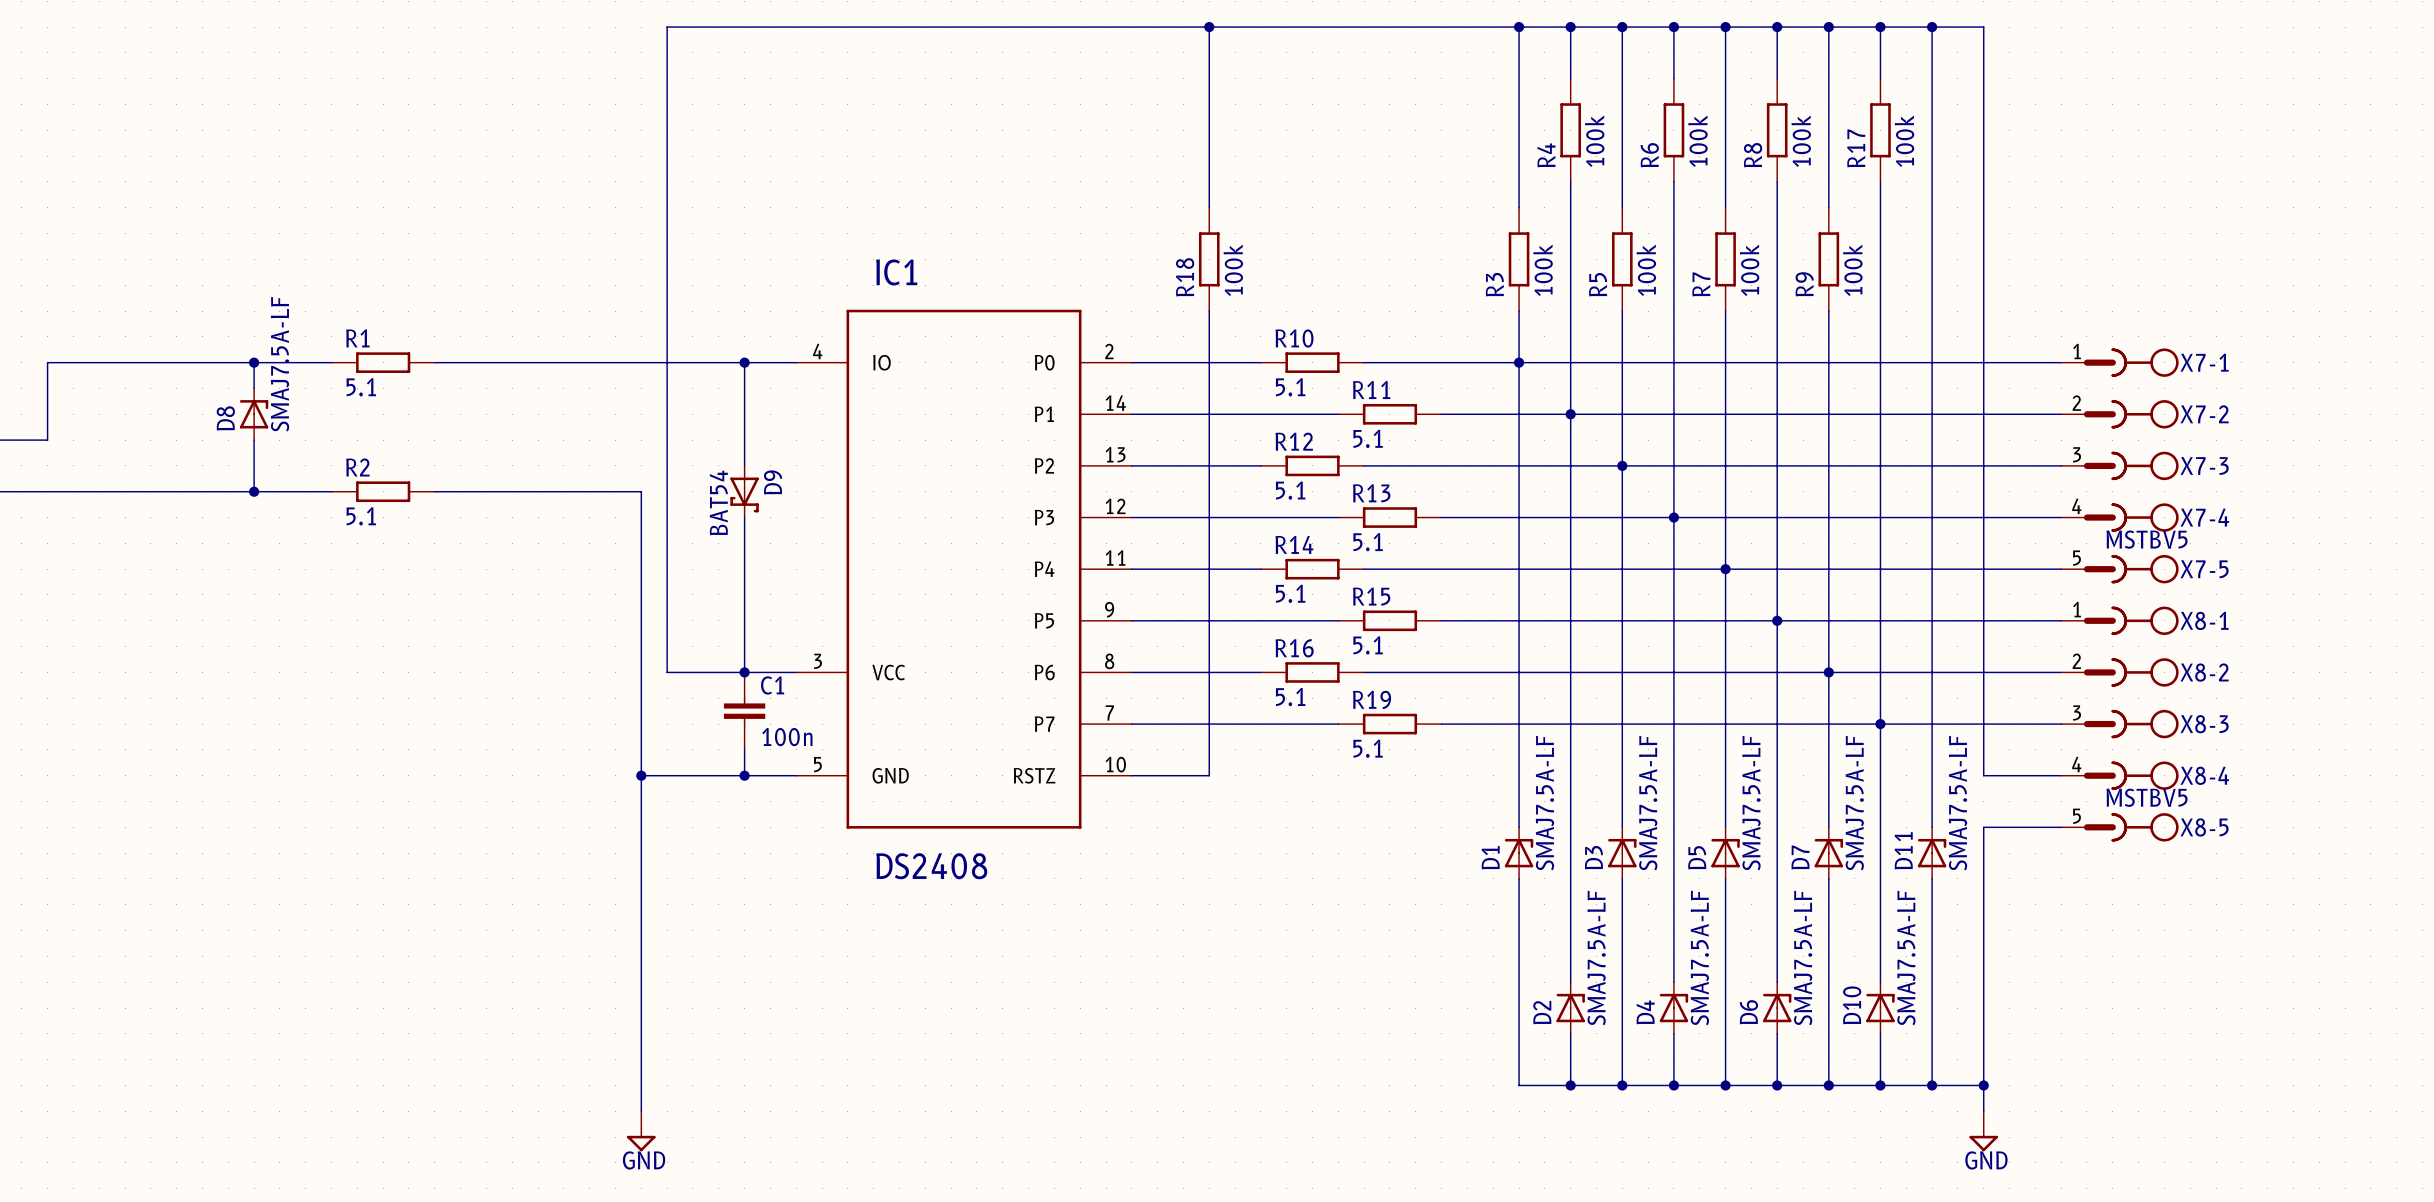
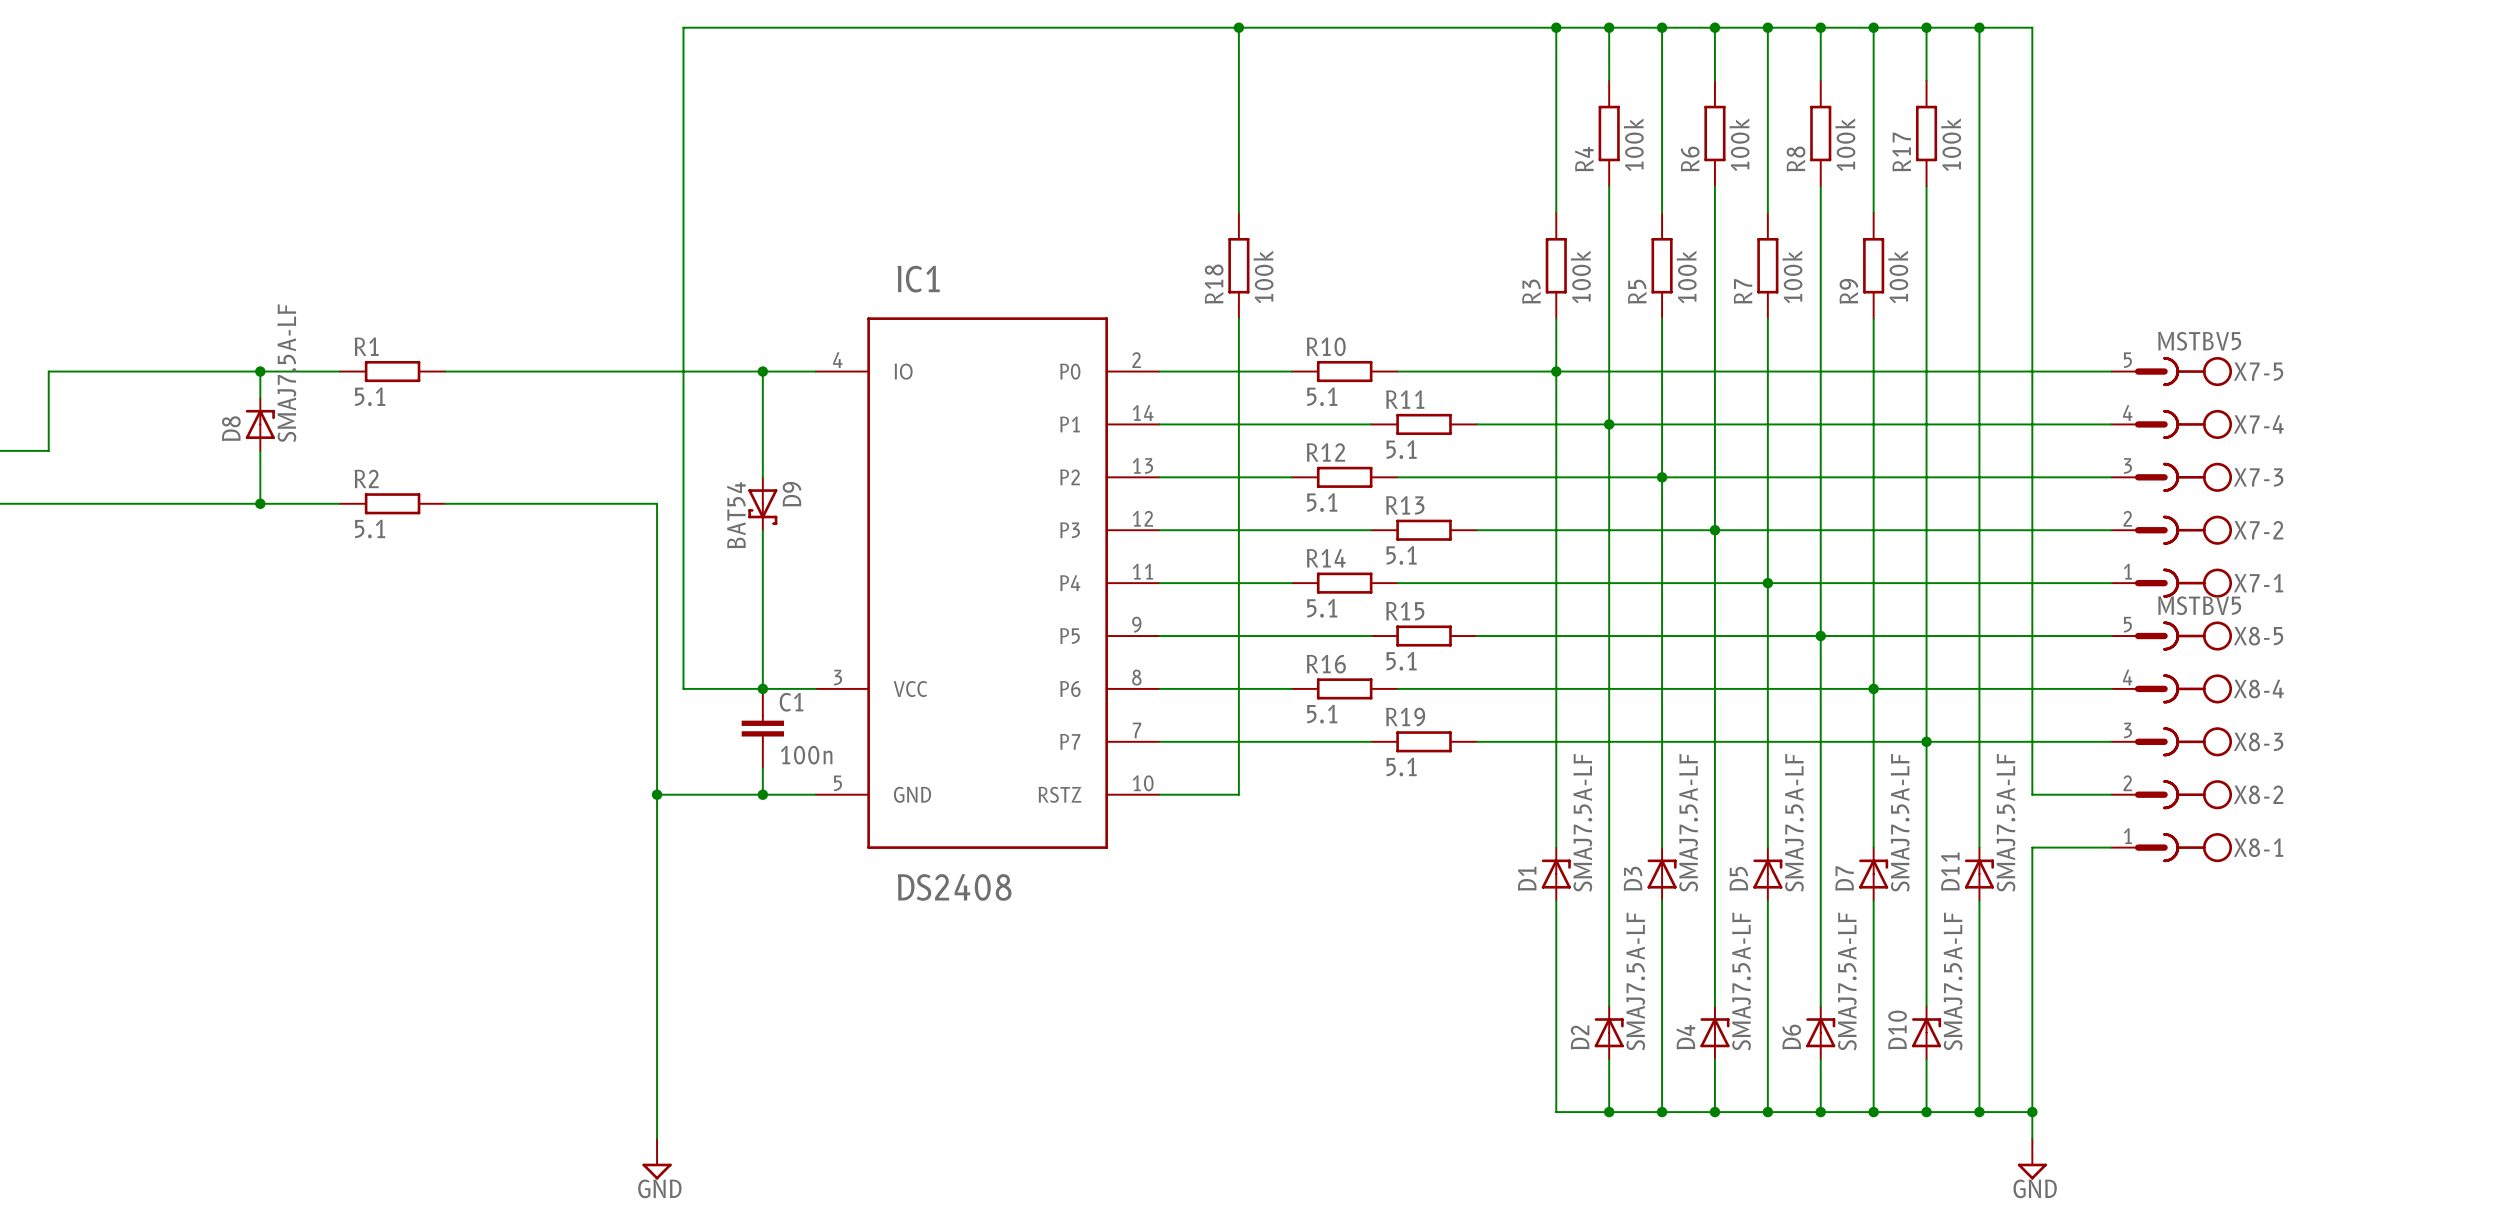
X7-1 position: (2119, 362) -> (2171, 583)
X7-2 position: (2119, 414) -> (2171, 530)
X7-4 position: (2119, 517) -> (2171, 424)
X7-5 position: (2119, 569) -> (2171, 371)
X8-1 position: (2119, 620) -> (2171, 847)
X8-2 position: (2119, 672) -> (2171, 794)
X8-4 position: (2119, 775) -> (2171, 688)
X8-5 position: (2119, 827) -> (2171, 636)

